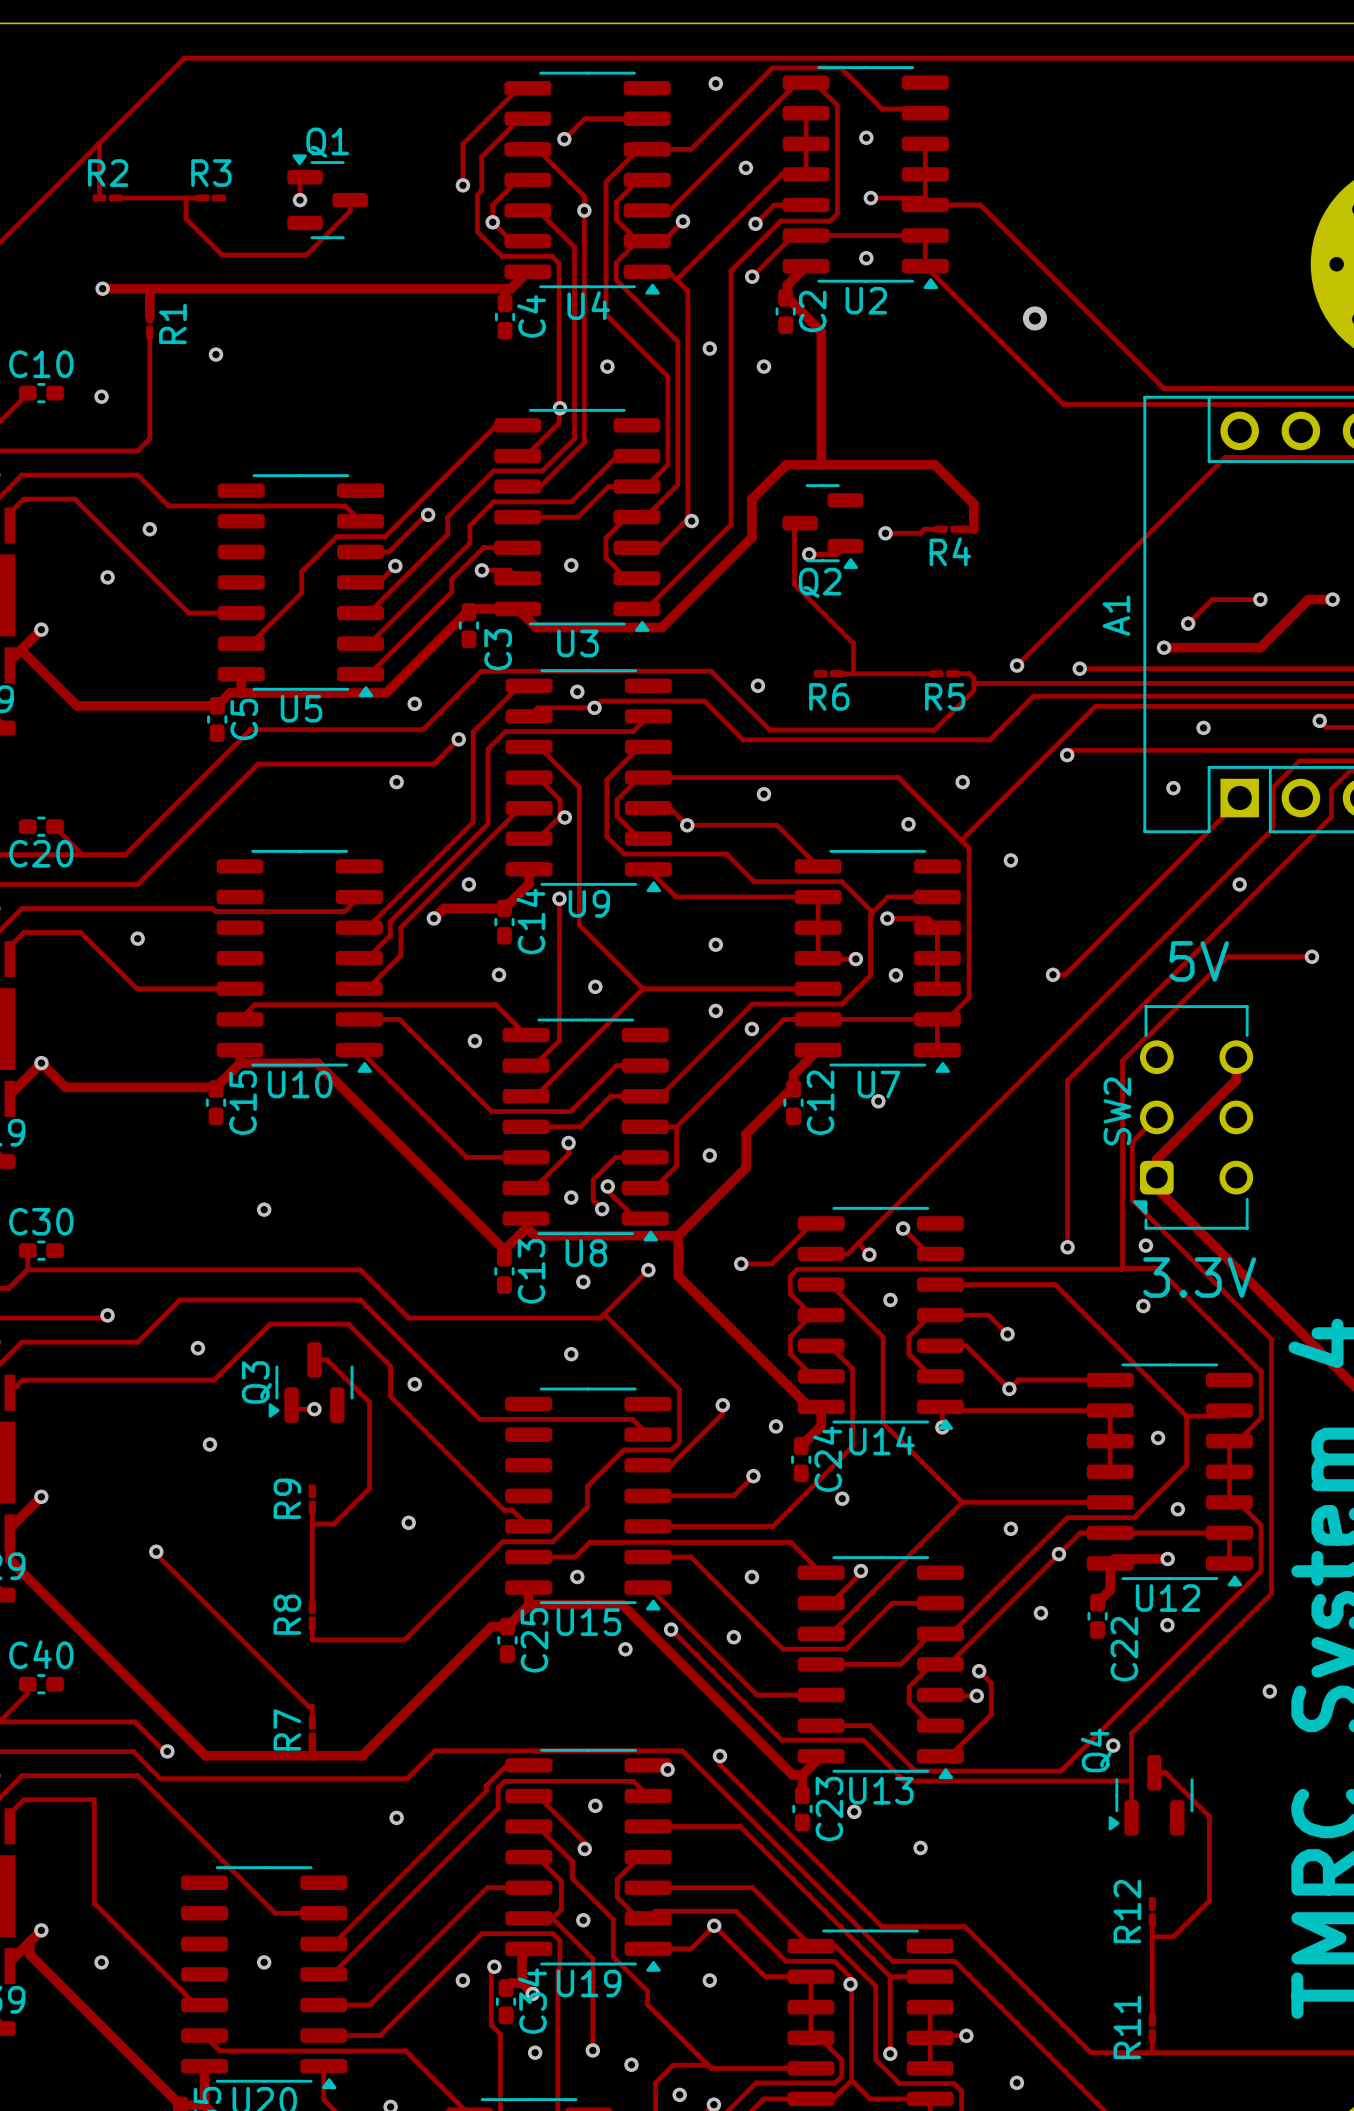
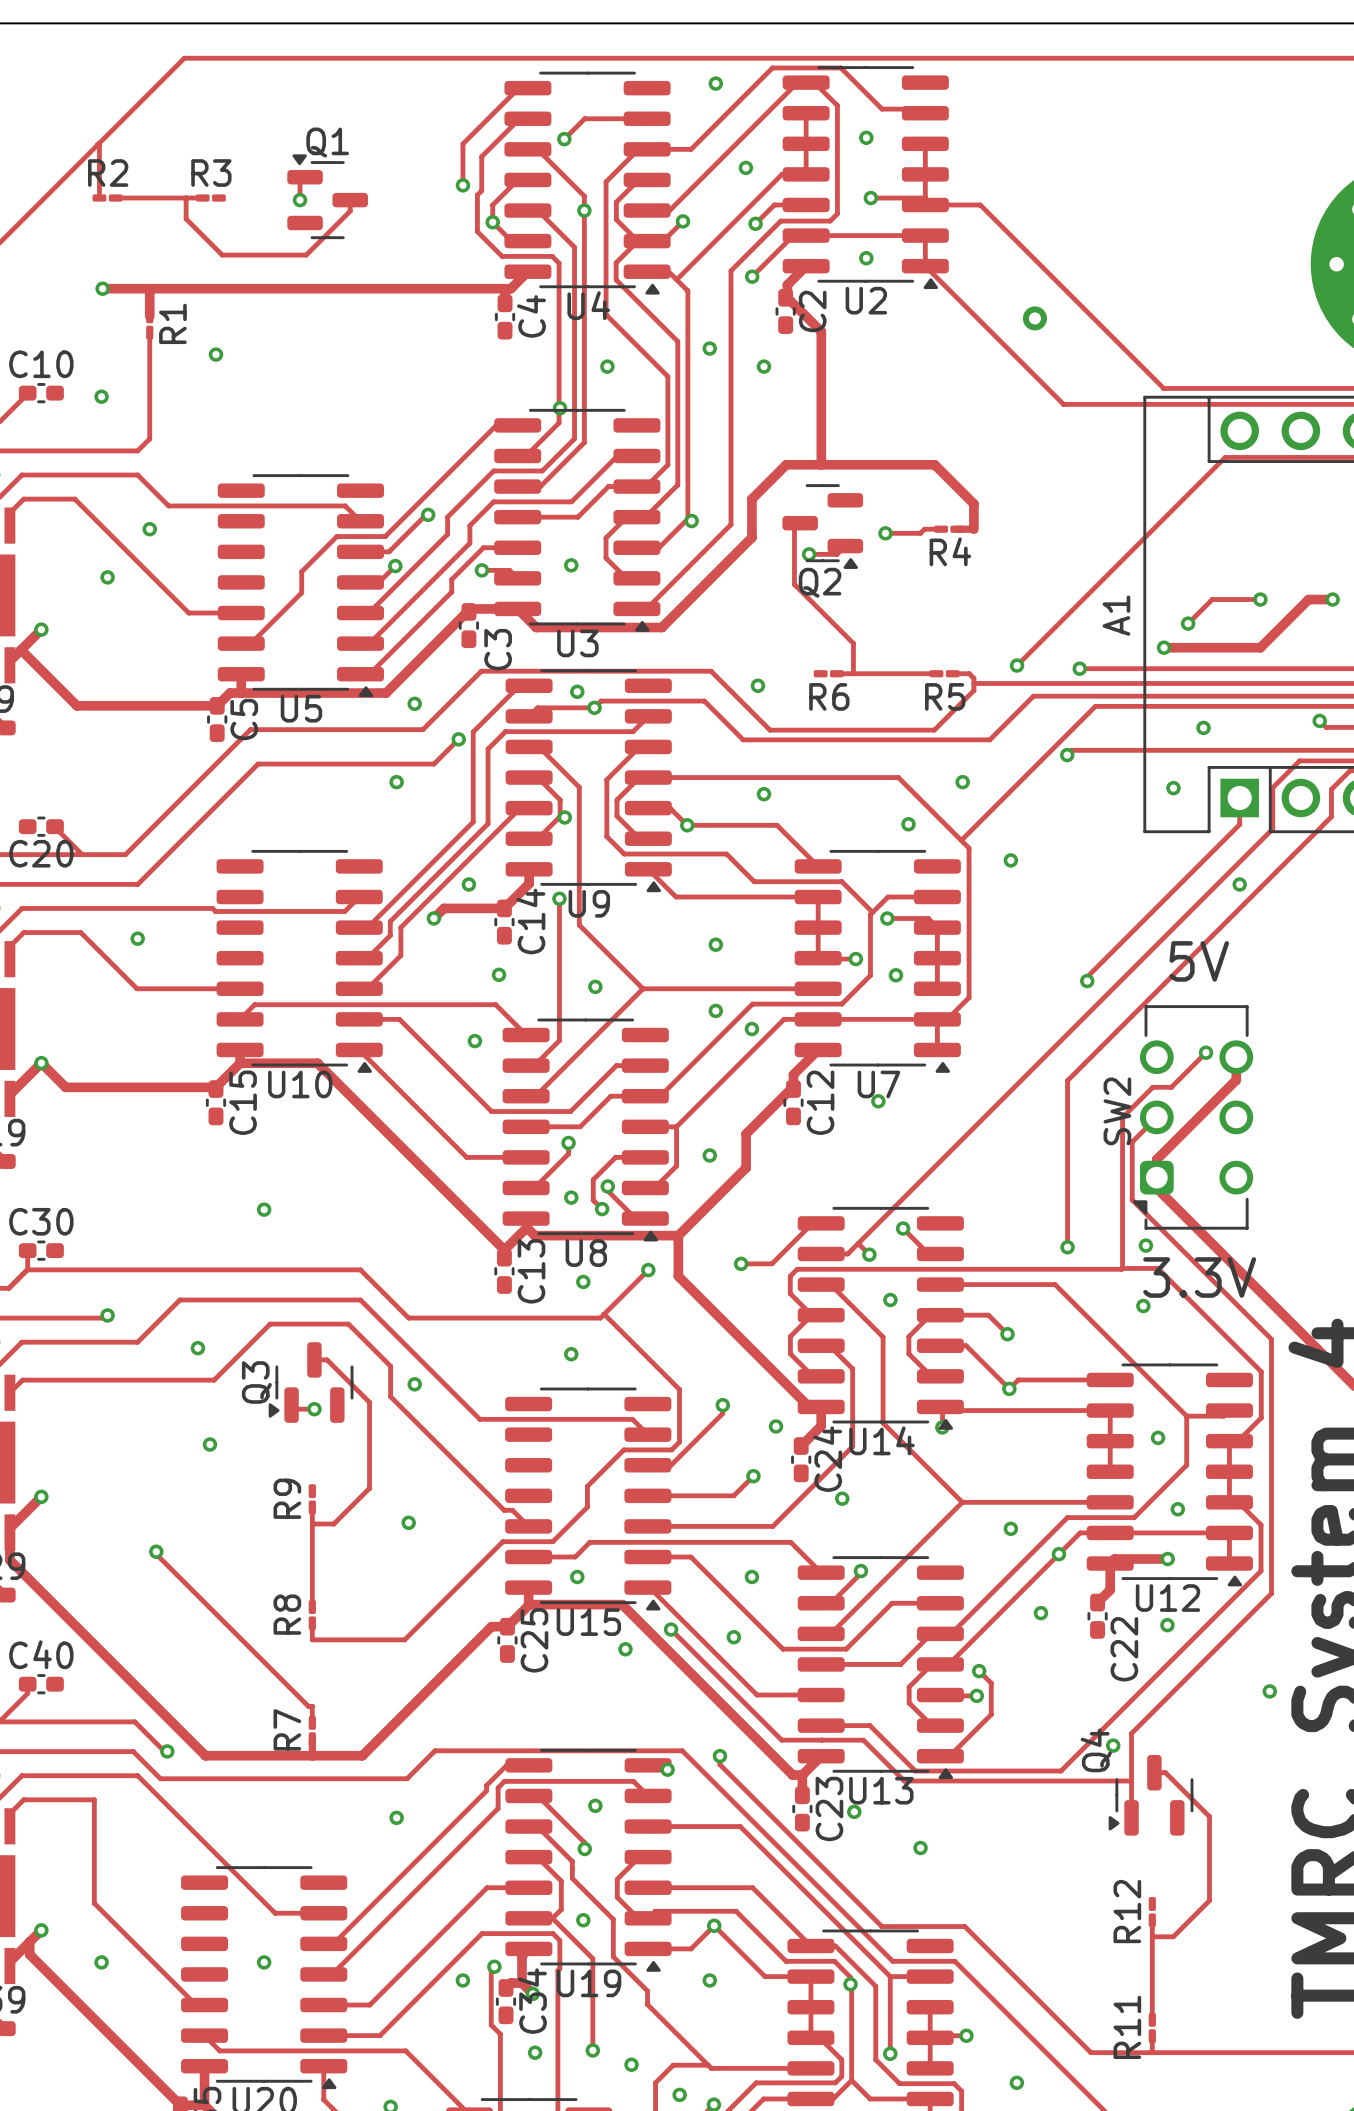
track: (1239, 800) (1065, 974) (1053, 974) -> (1239, 800) (1239, 824) (1087, 976) (1087, 981)
track: (1311, 956) (1227, 956) (1122, 1060) (1122, 1117) -> (1206, 1052) (1171, 1087) (1152, 1087) (1122, 1117)
via: (1311, 956) -> none
via position: (1053, 974) -> (1087, 981)
via: none -> (1206, 1052)

